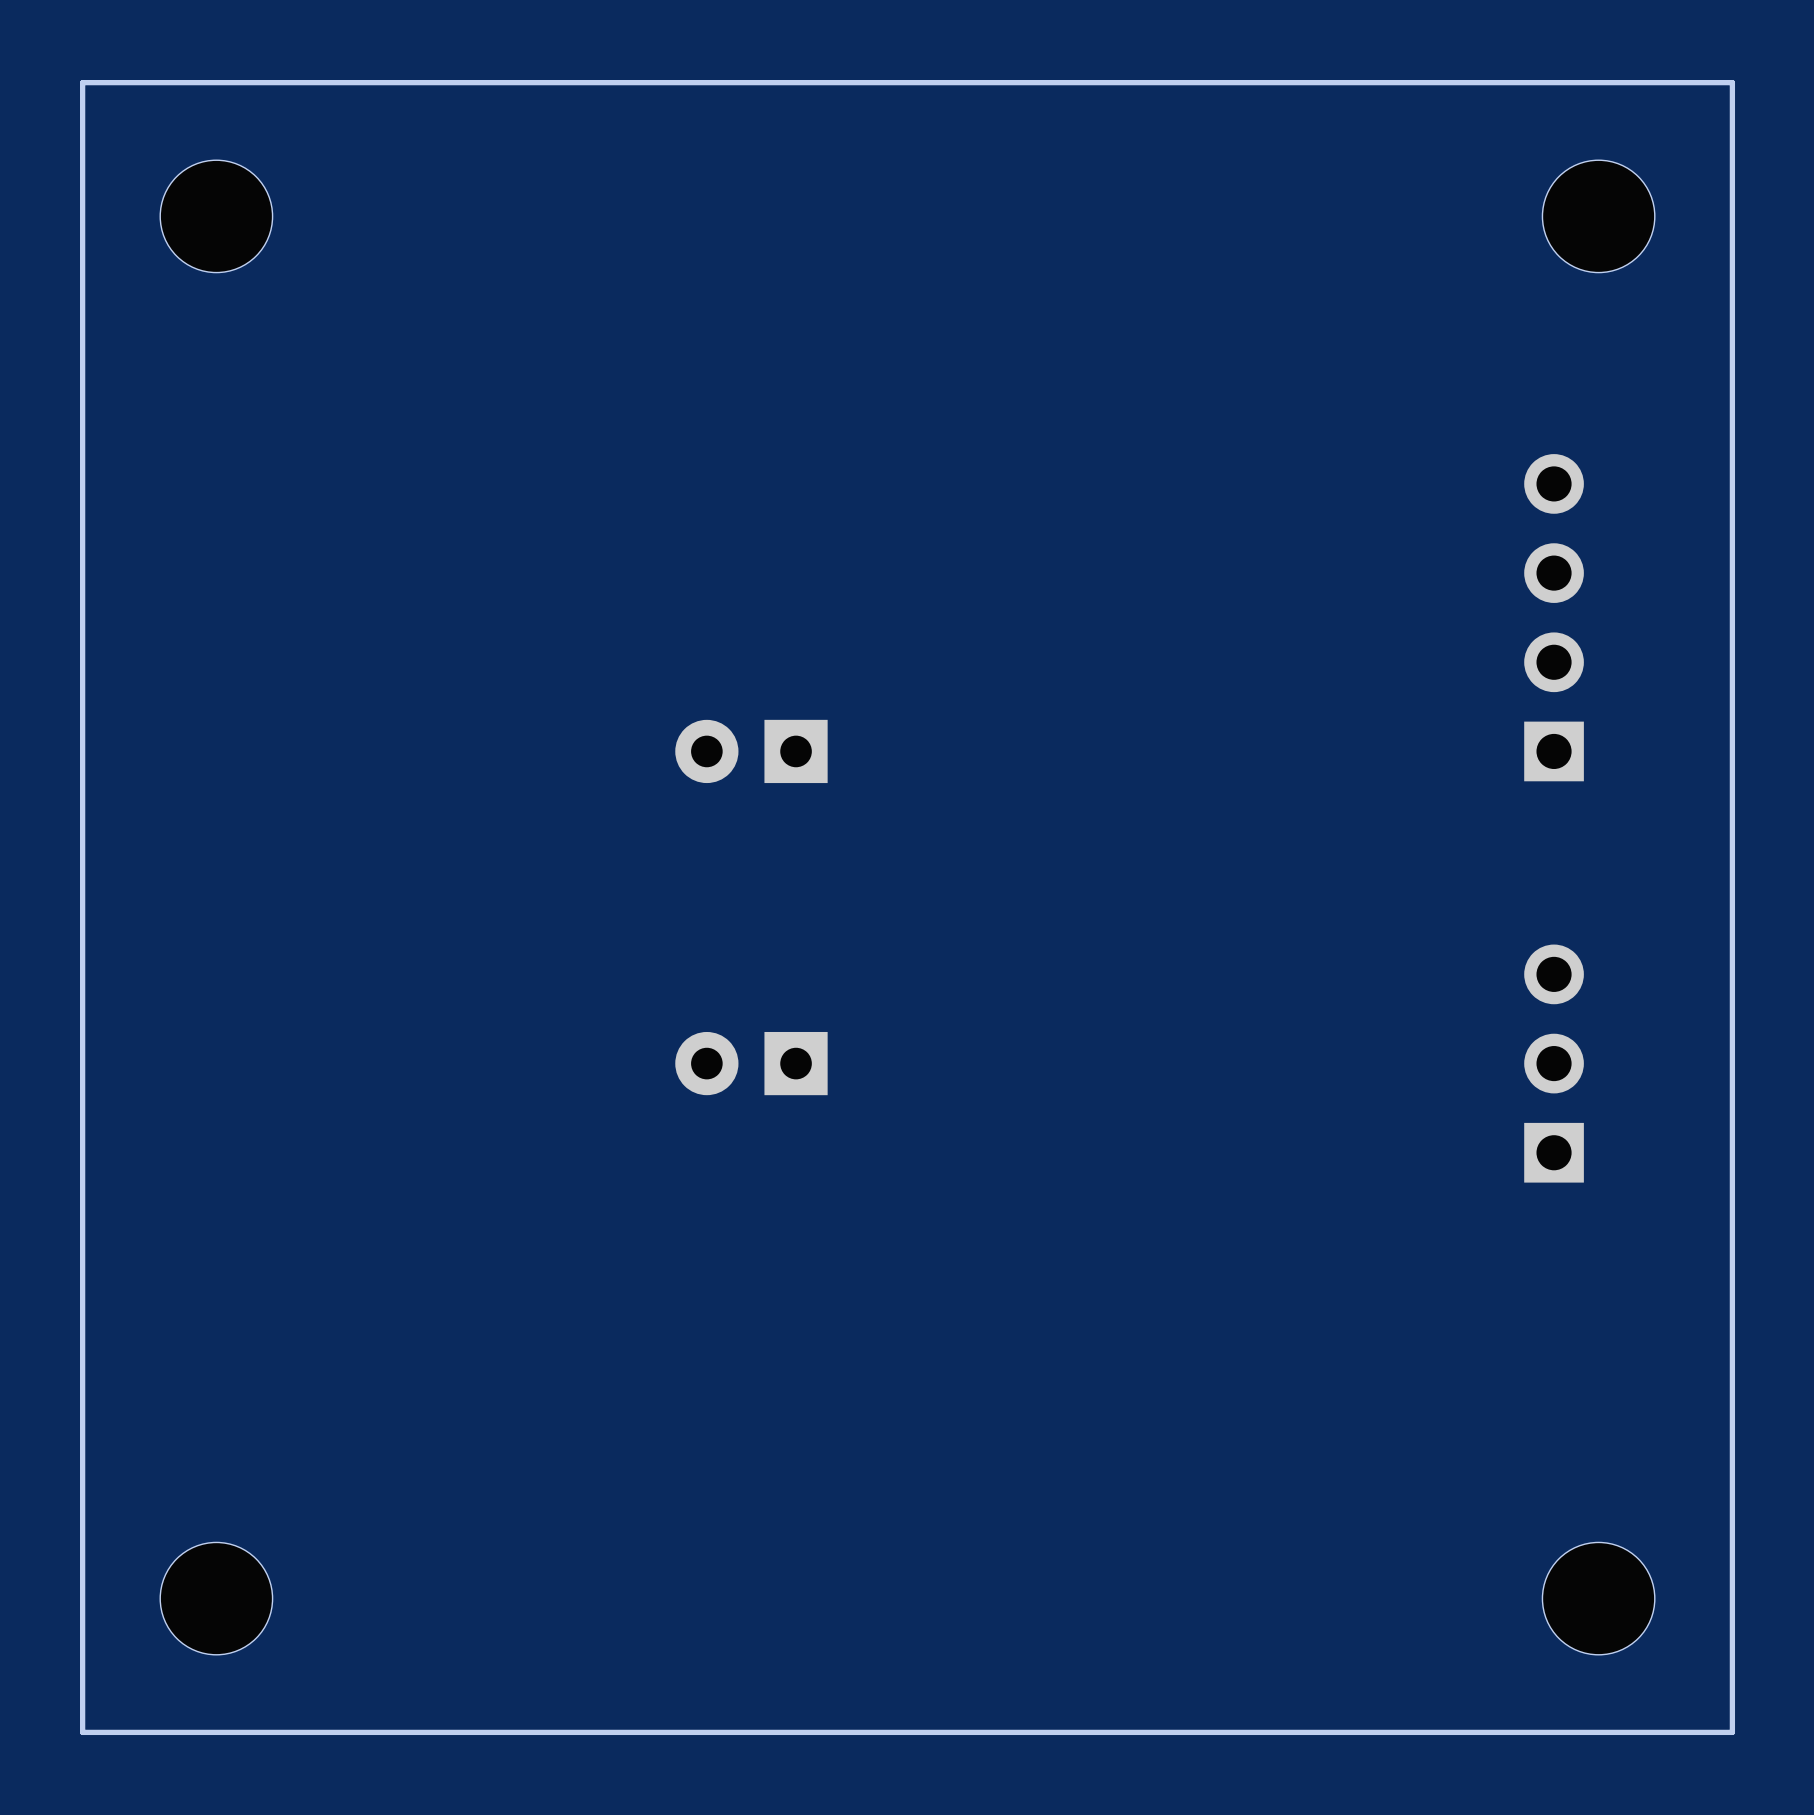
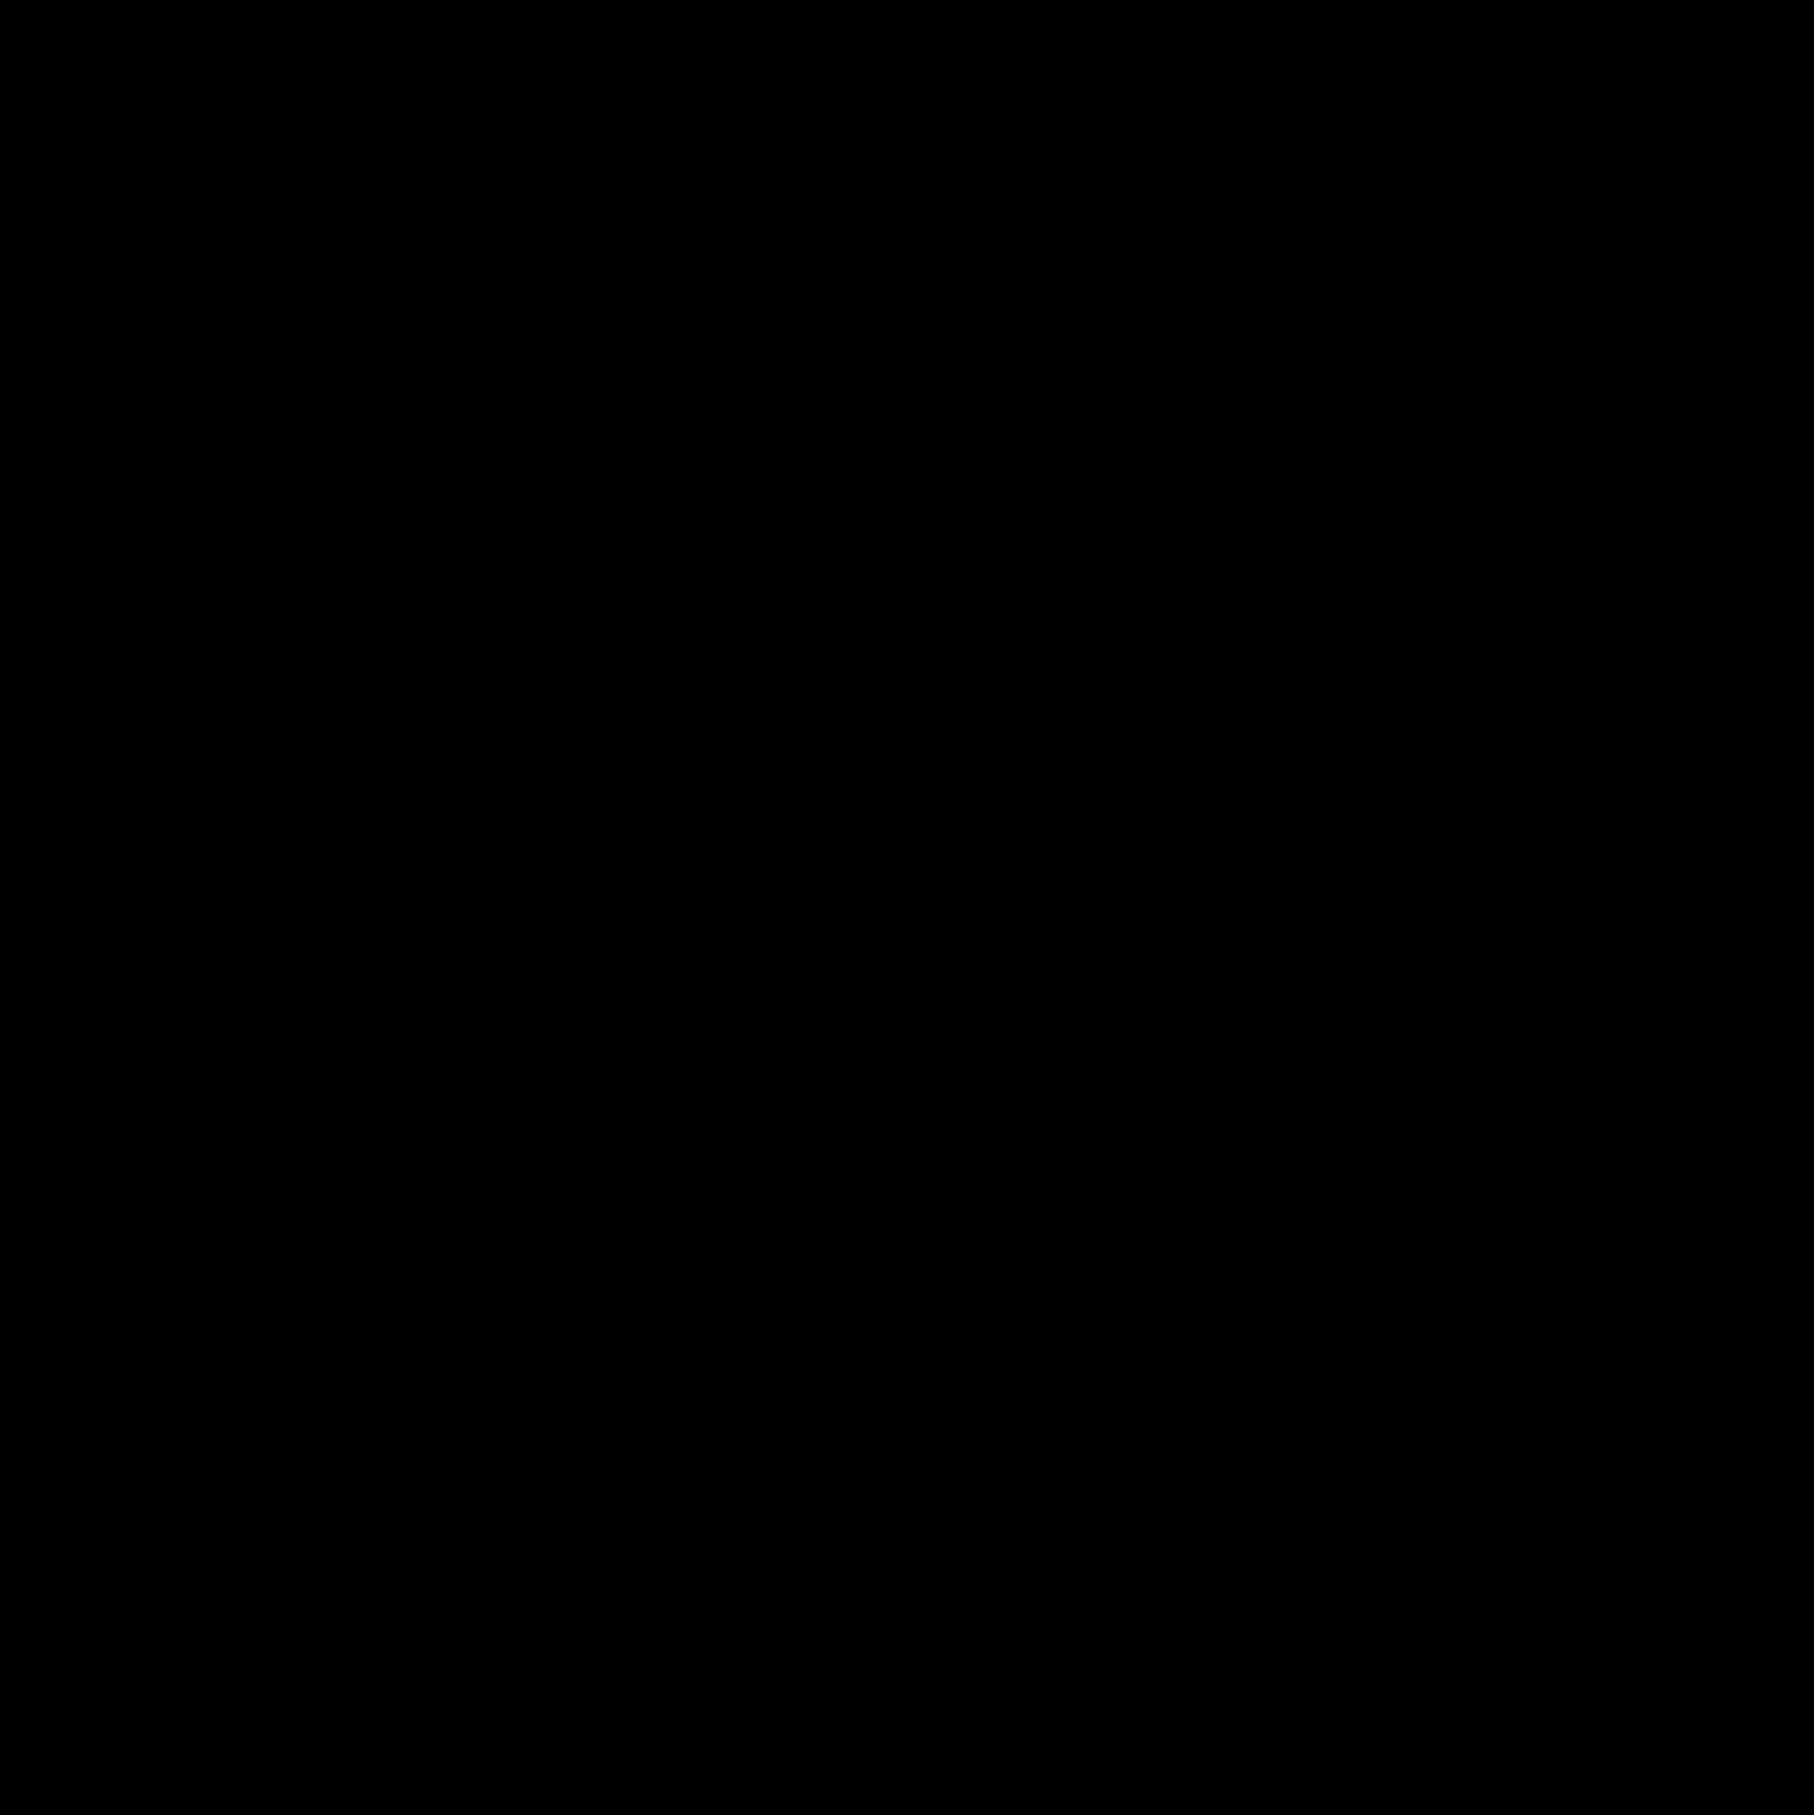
board edge: (1732, 82) (1732, 1732) (82, 1732) (82, 82) (1732, 82) -> none
part: (216, 216) -> none
part: (1598, 216) -> none
part: (1554, 617) -> none
part: (751, 751) -> none
part: (751, 1063) -> none
part: (1554, 1063) -> none
part: (216, 1598) -> none
part: (1598, 1598) -> none

